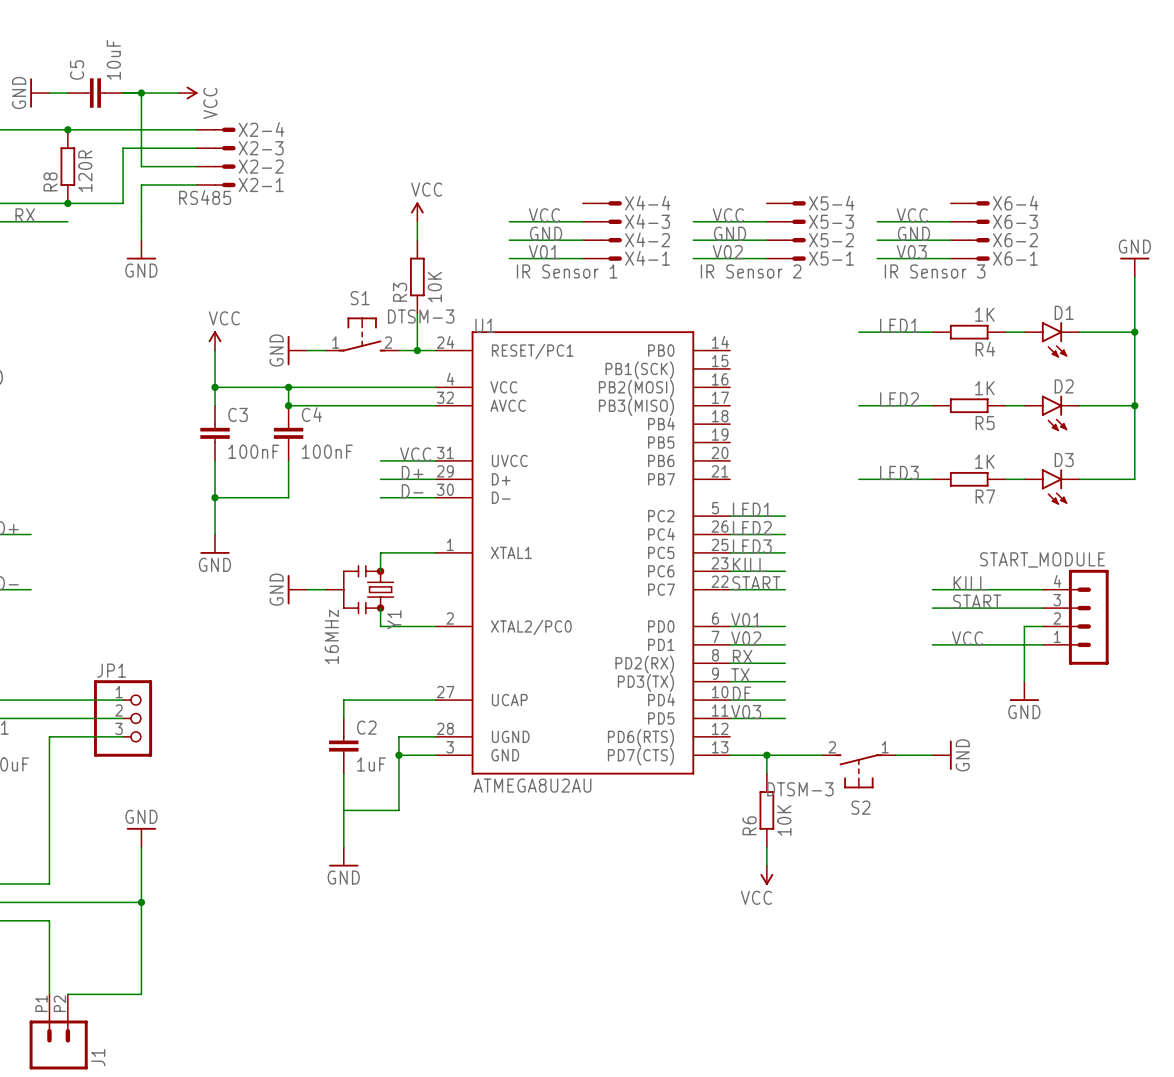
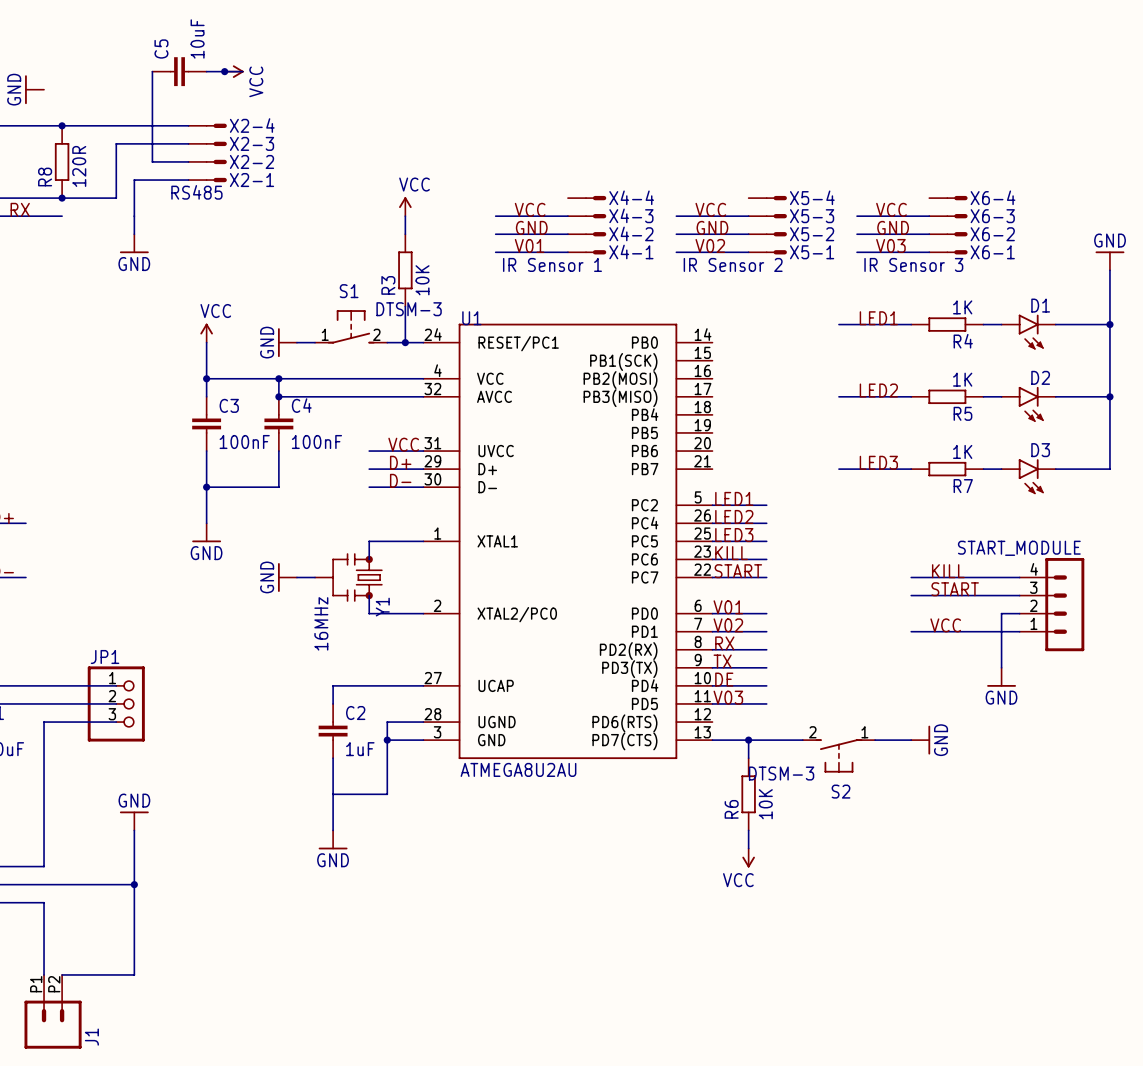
wire: none -> (206, 71) (242, 71)
junction: none -> (224, 71)
wire: (49, 93) (67, 93) -> none
C5 position: (95, 93) -> (179, 71)
wire: (123, 93) (178, 93) -> none
wire: (141, 93) (141, 166) (159, 166) -> (152, 71) (152, 161)
junction: (141, 93) -> none
power symbol position: VCC (187, 93) -> VCC (234, 71)

